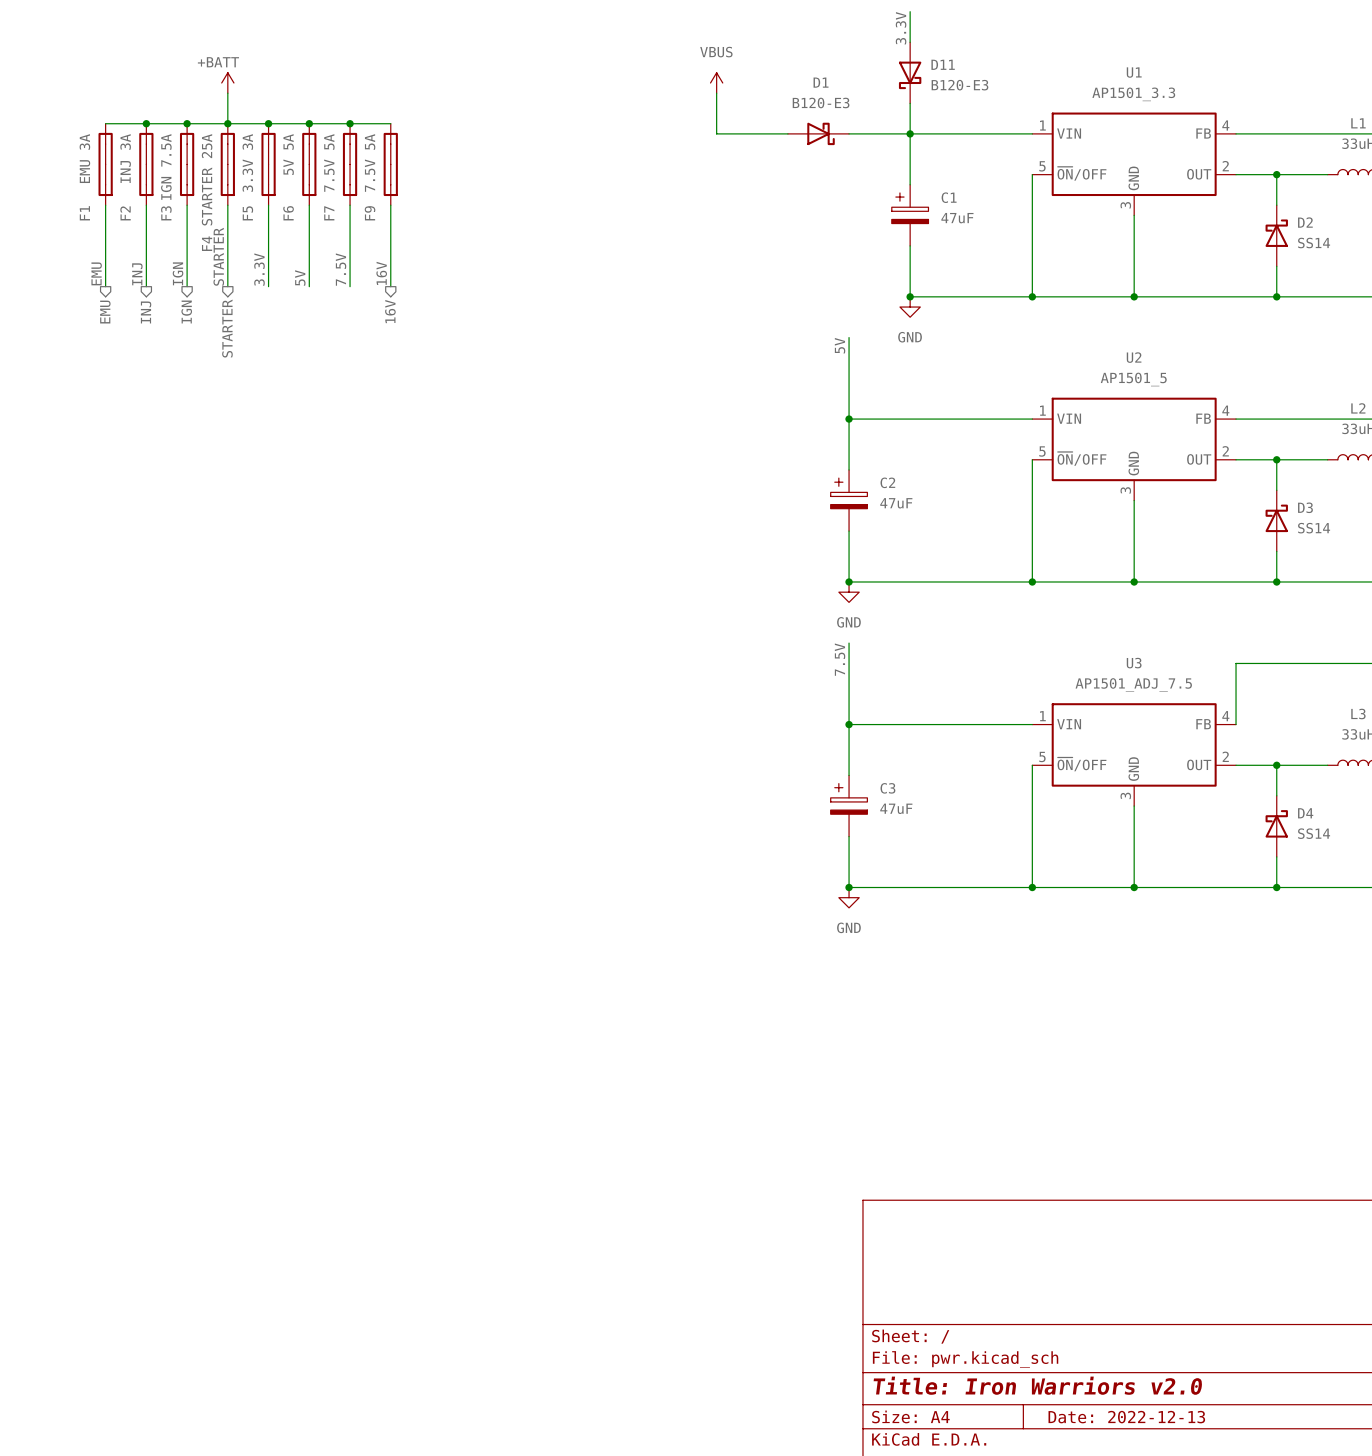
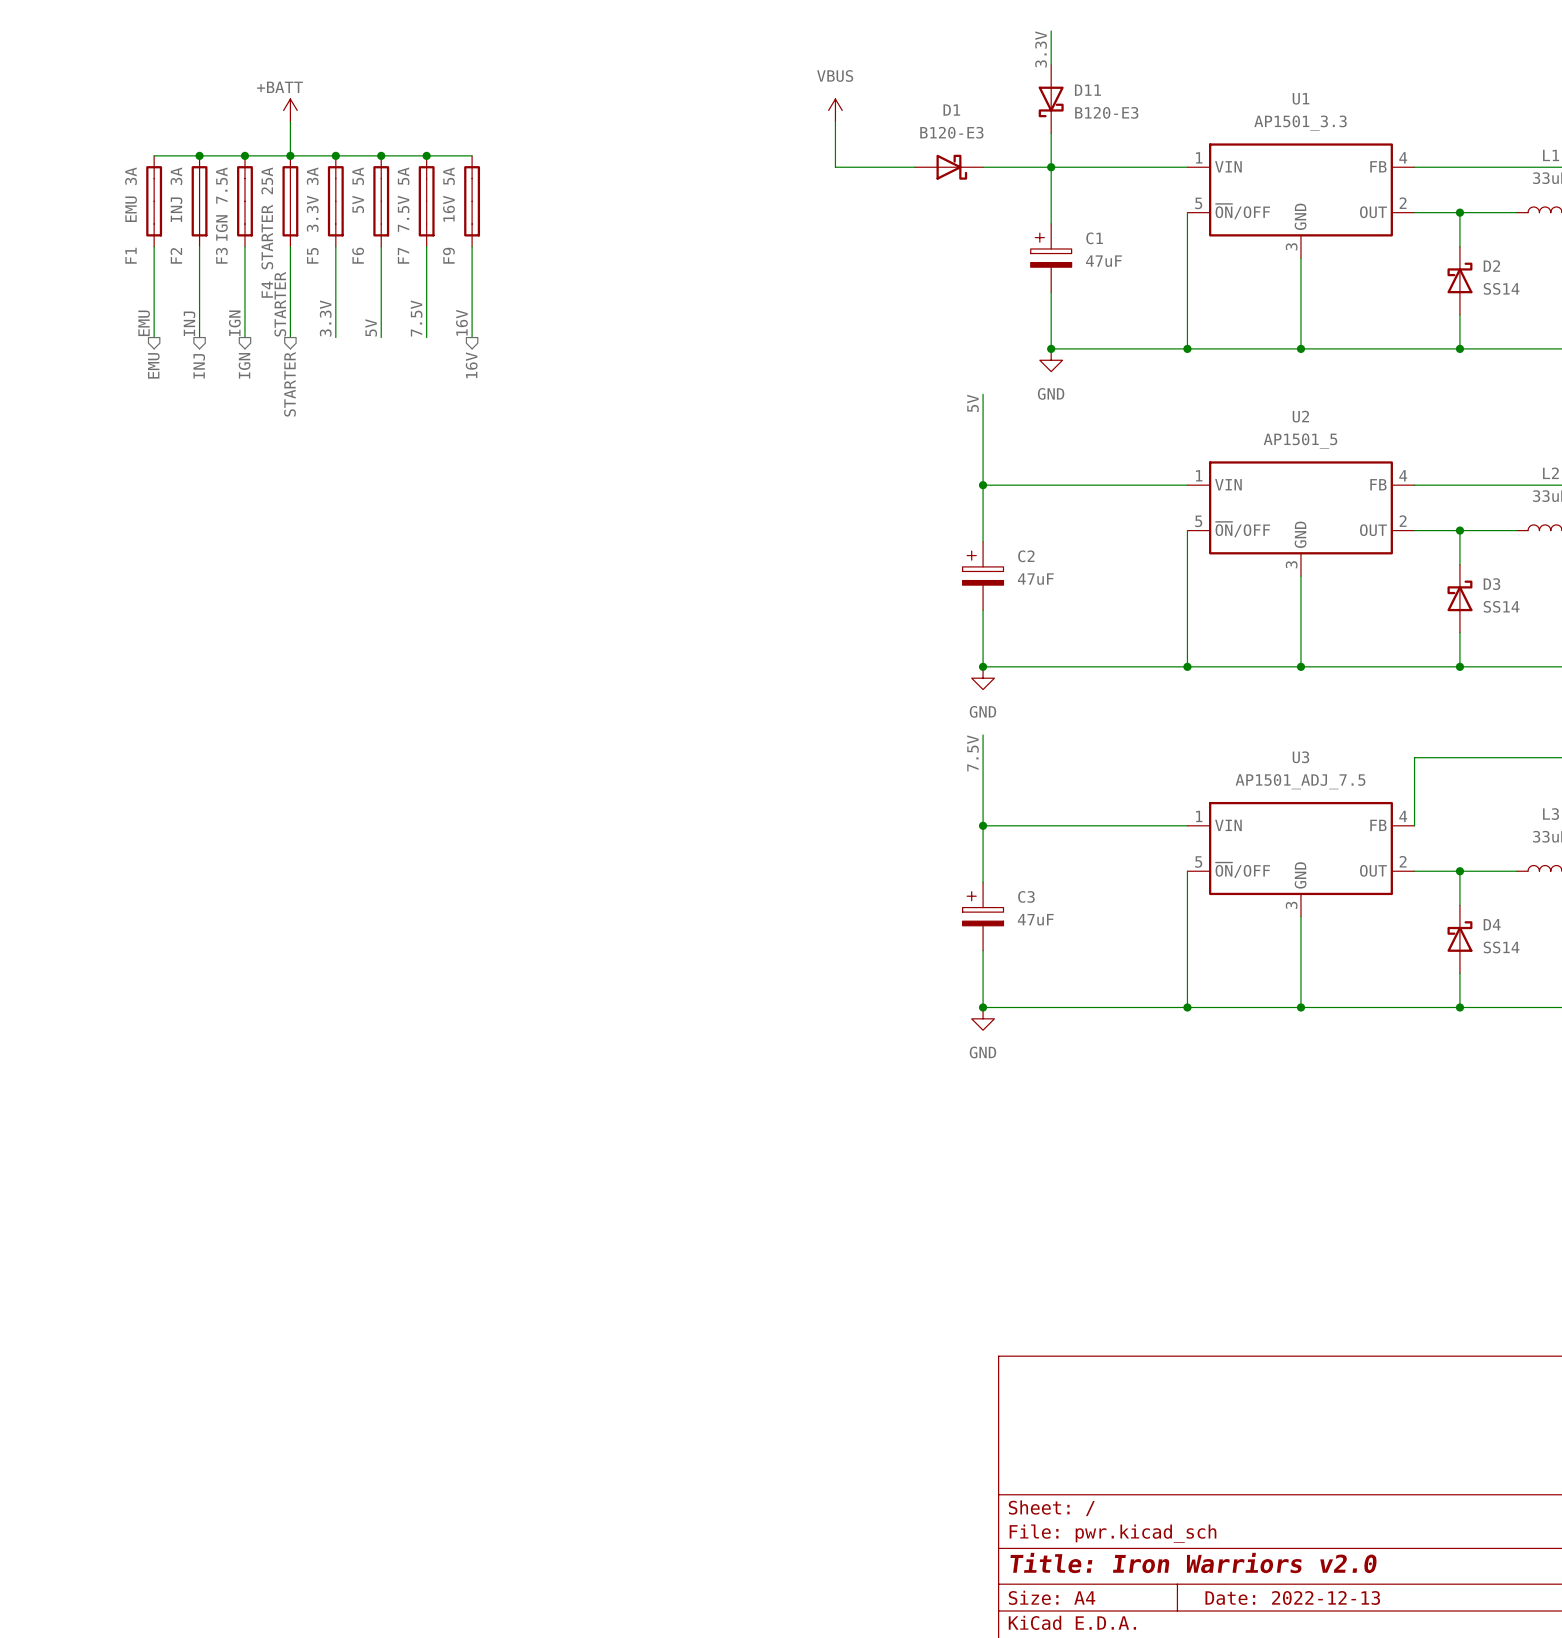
F9 value: 7.5V 5A (370, 162) -> 16V 5A (448, 194)

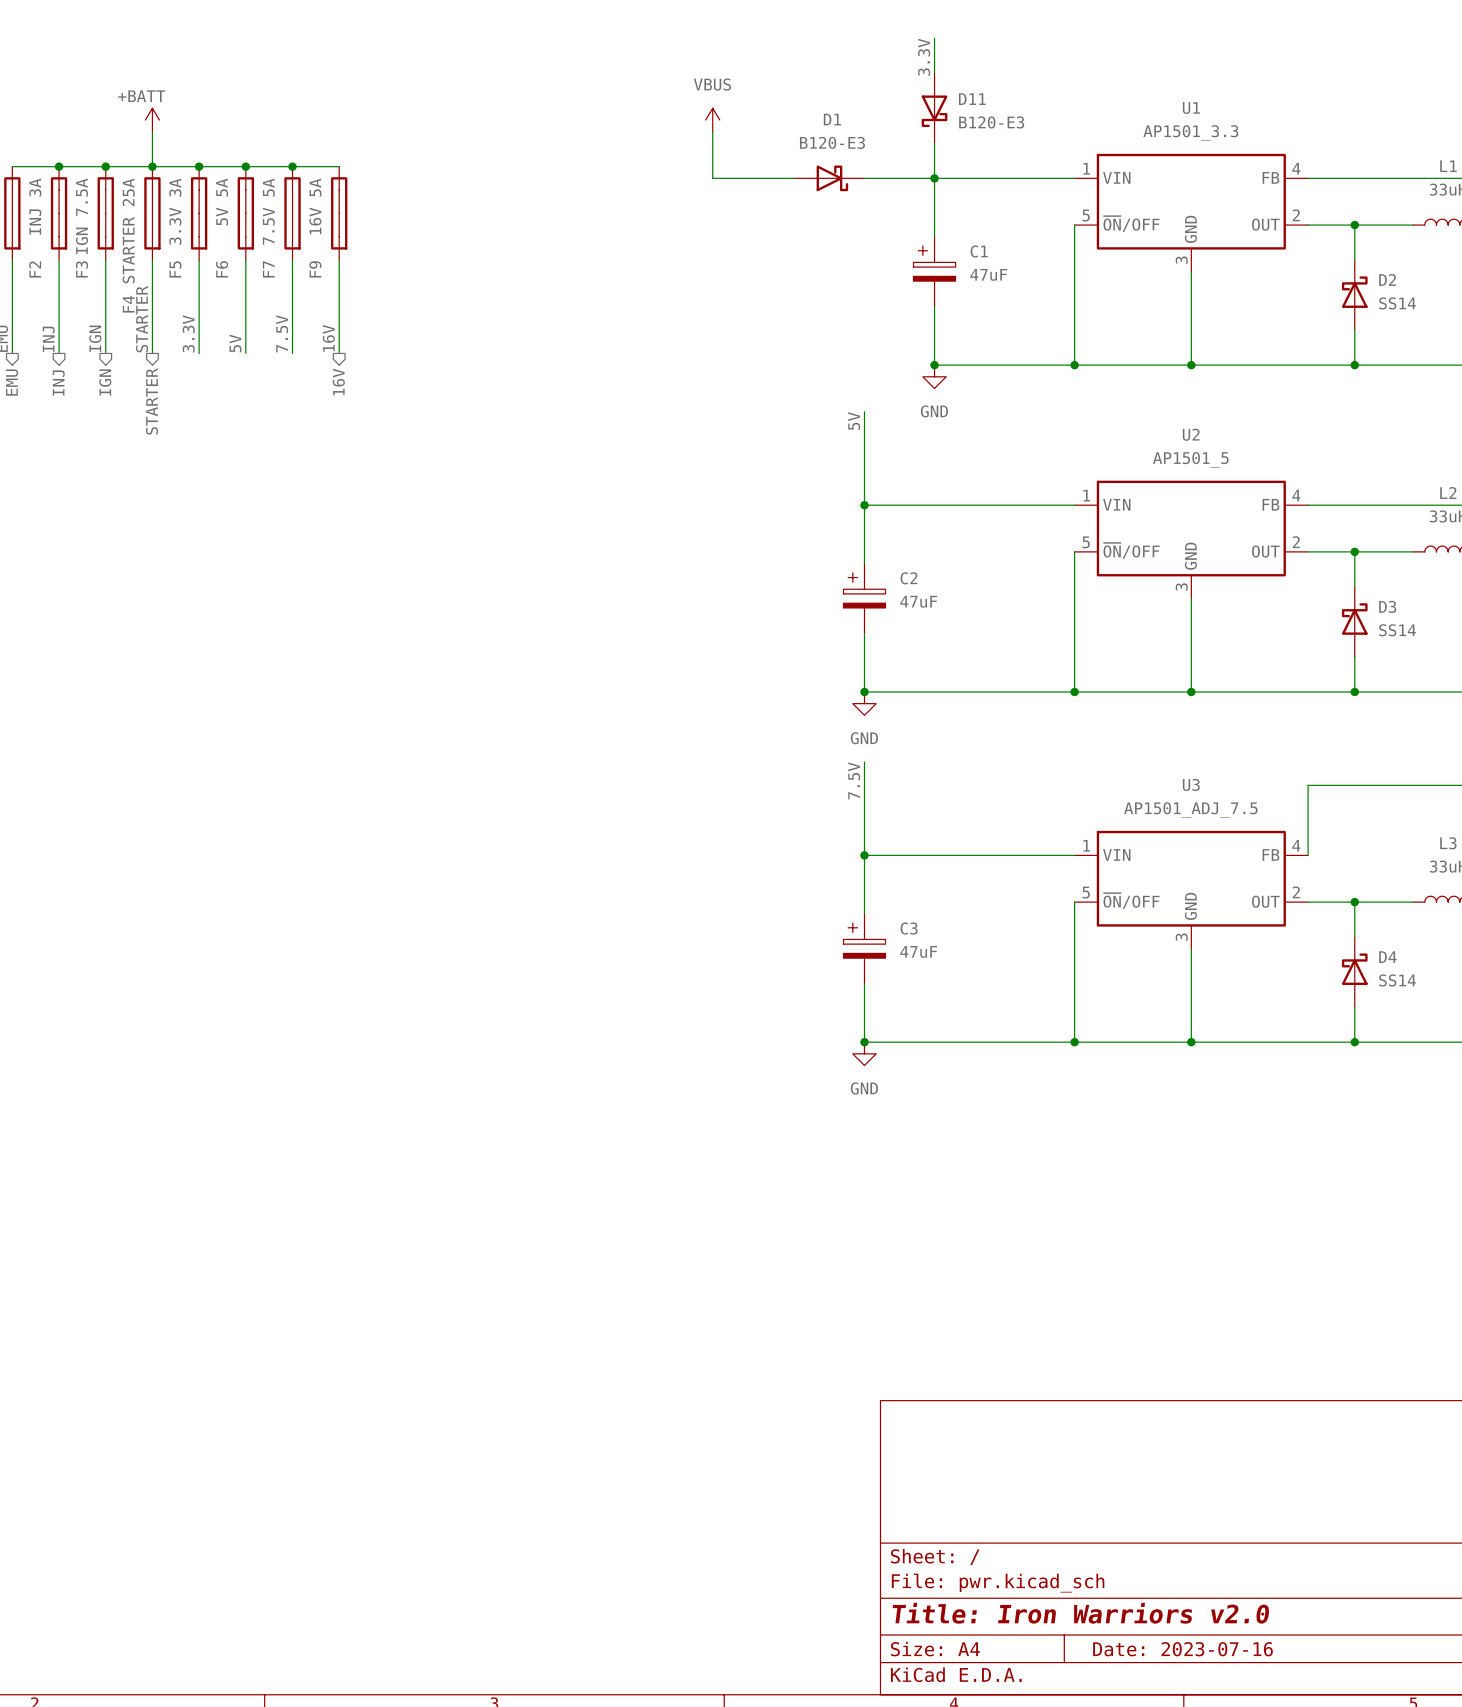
title block: Date: 2022-12-13 (1292, 1597) -> Date: 2023-07-16 (1182, 1649)

